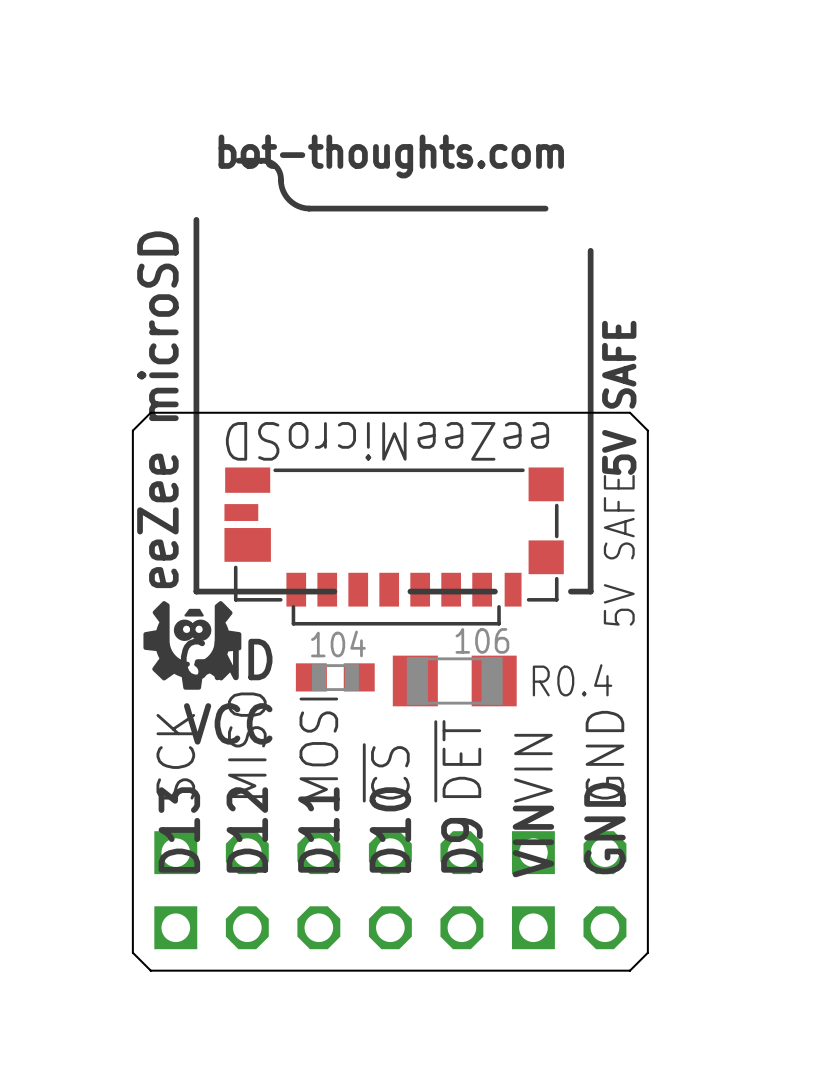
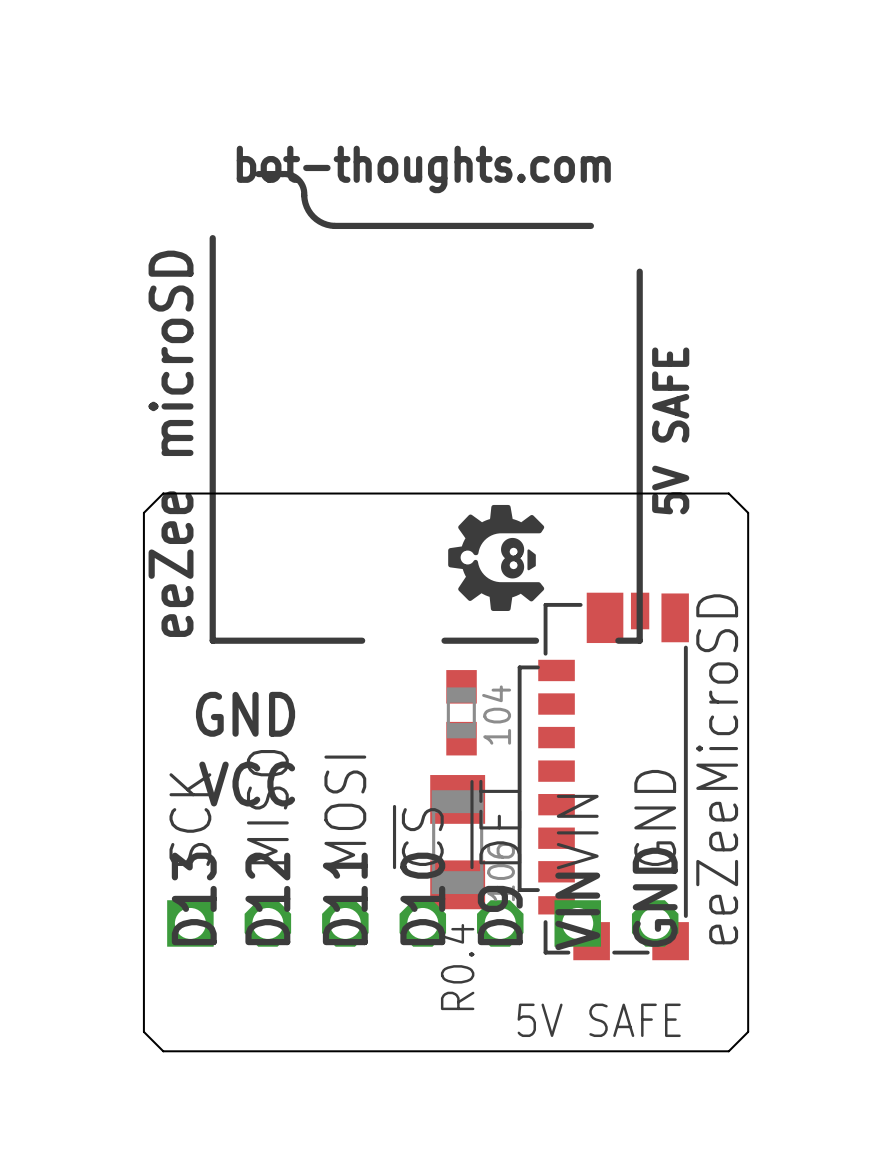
text rotation: 0° (387, 441) -> 90° clockwise (717, 769)
drawing: none -> [448, 504, 545, 611]
board edge: (132, 473) (132, 430) (150, 412) (629, 412) (647, 430) (647, 952) (629, 970) -> (143, 512) (163, 493) (728, 493) (748, 512) (748, 1031) (728, 1051) (682, 1051)
part rotation: 0° (394, 546) -> 90° clockwise (603, 776)
part position: (394, 546) -> (603, 776)
text rotation: 0° (619, 550) -> 90° clockwise (599, 1020)
text position: 5V SAFE (619, 550) -> 5V SAFE (599, 1020)
drawing: [143, 601, 242, 690] -> none
part rotation: 0° (335, 677) -> 90° clockwise (461, 712)
part position: (335, 677) -> (461, 712)
part rotation: 0° (454, 680) -> 90° clockwise (457, 842)
part position: (454, 680) -> (457, 842)
text rotation: 0° (572, 680) -> 90° counterclockwise (456, 967)
text position: R0.4 (572, 680) -> R0.4 (456, 967)
part: (318, 927) -> none
part: (569, 927) -> none

